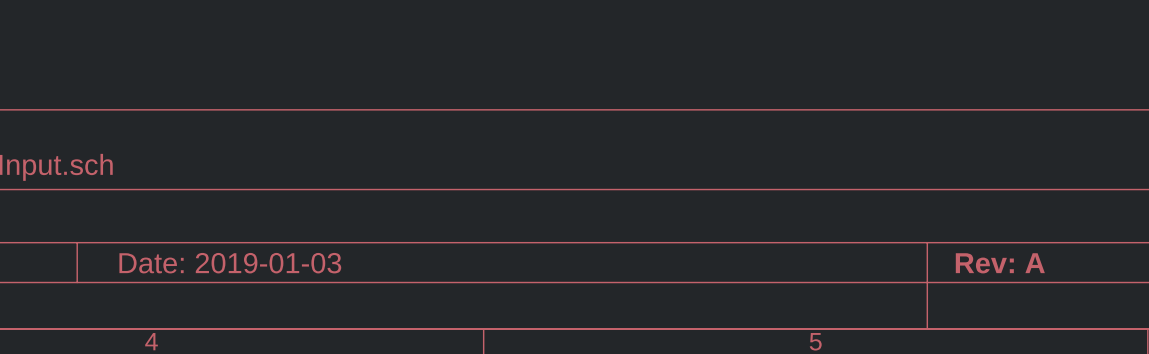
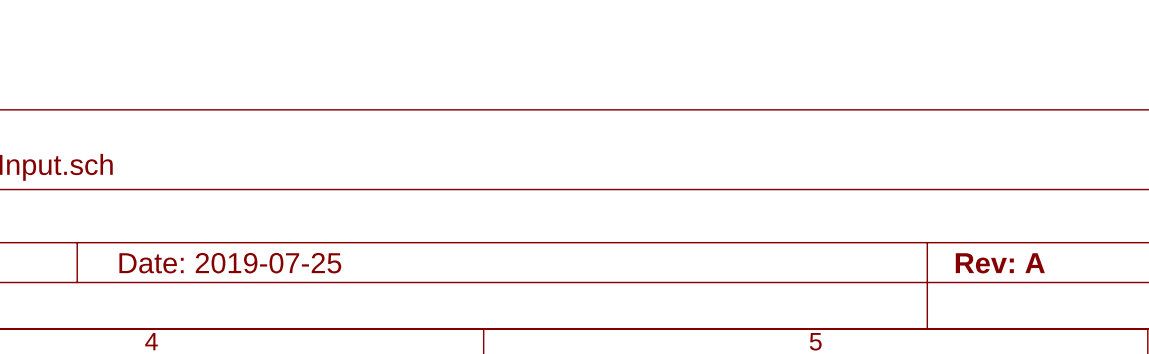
title block: Date: 2019-01-03 (230, 263) -> Date: 2019-07-25 (230, 263)

